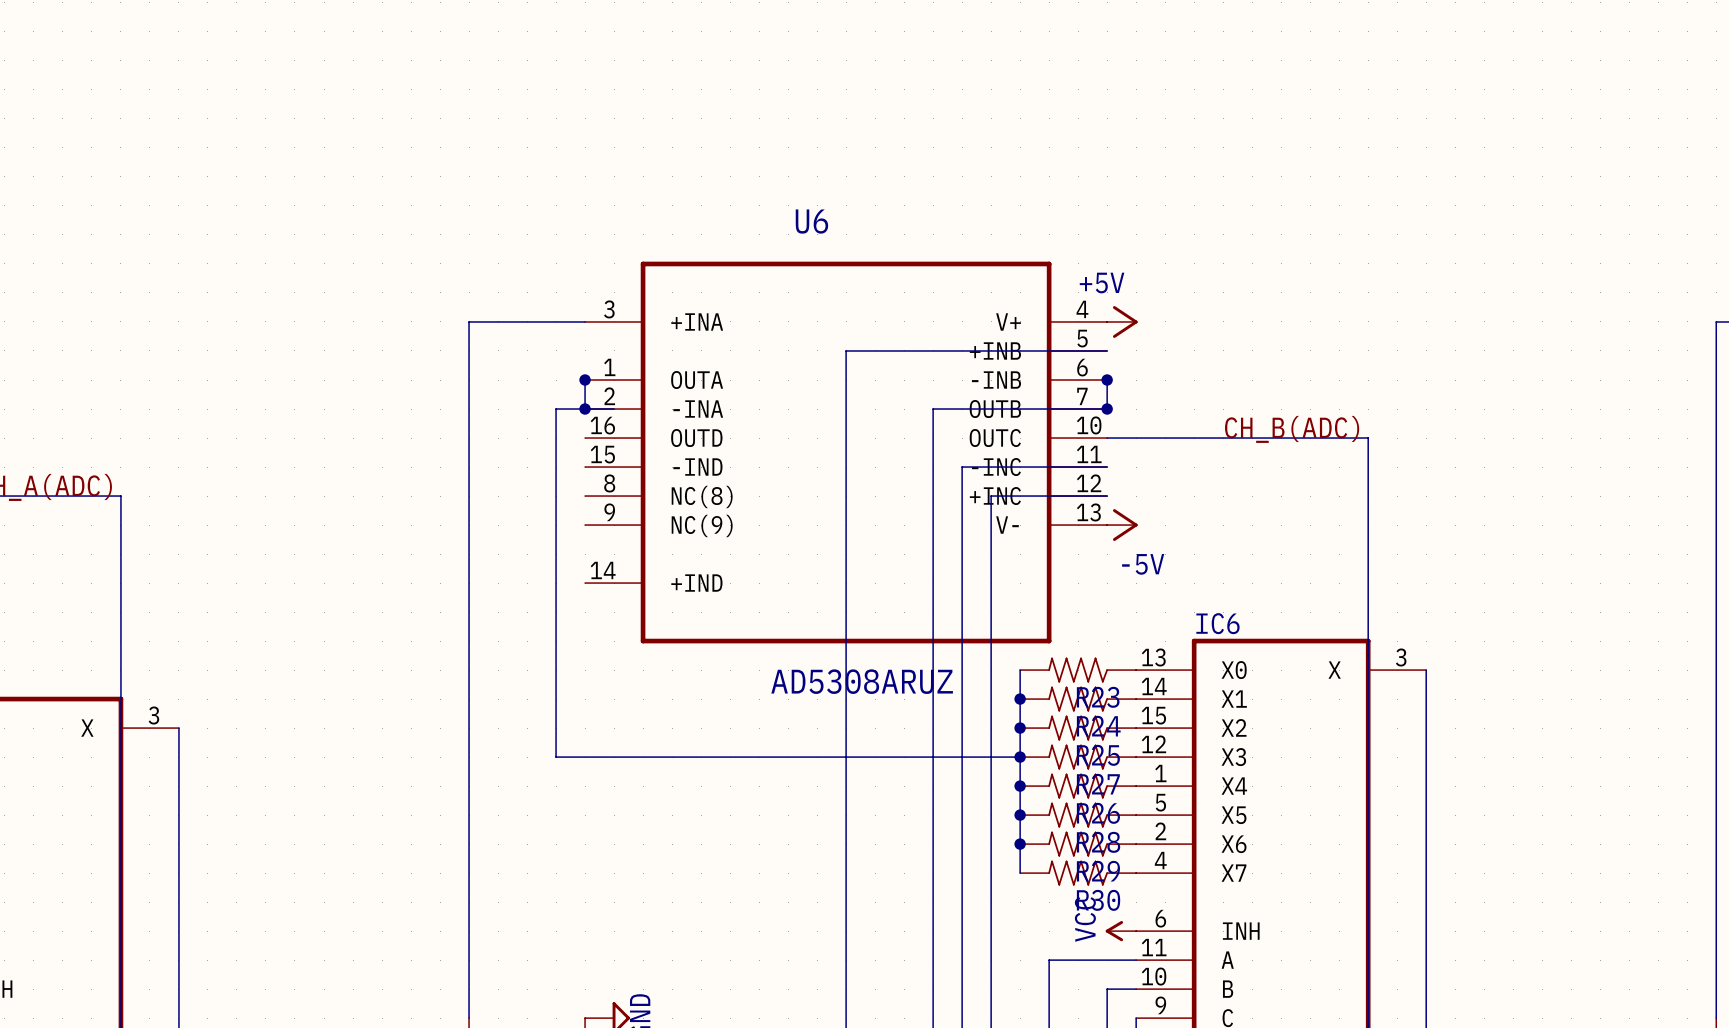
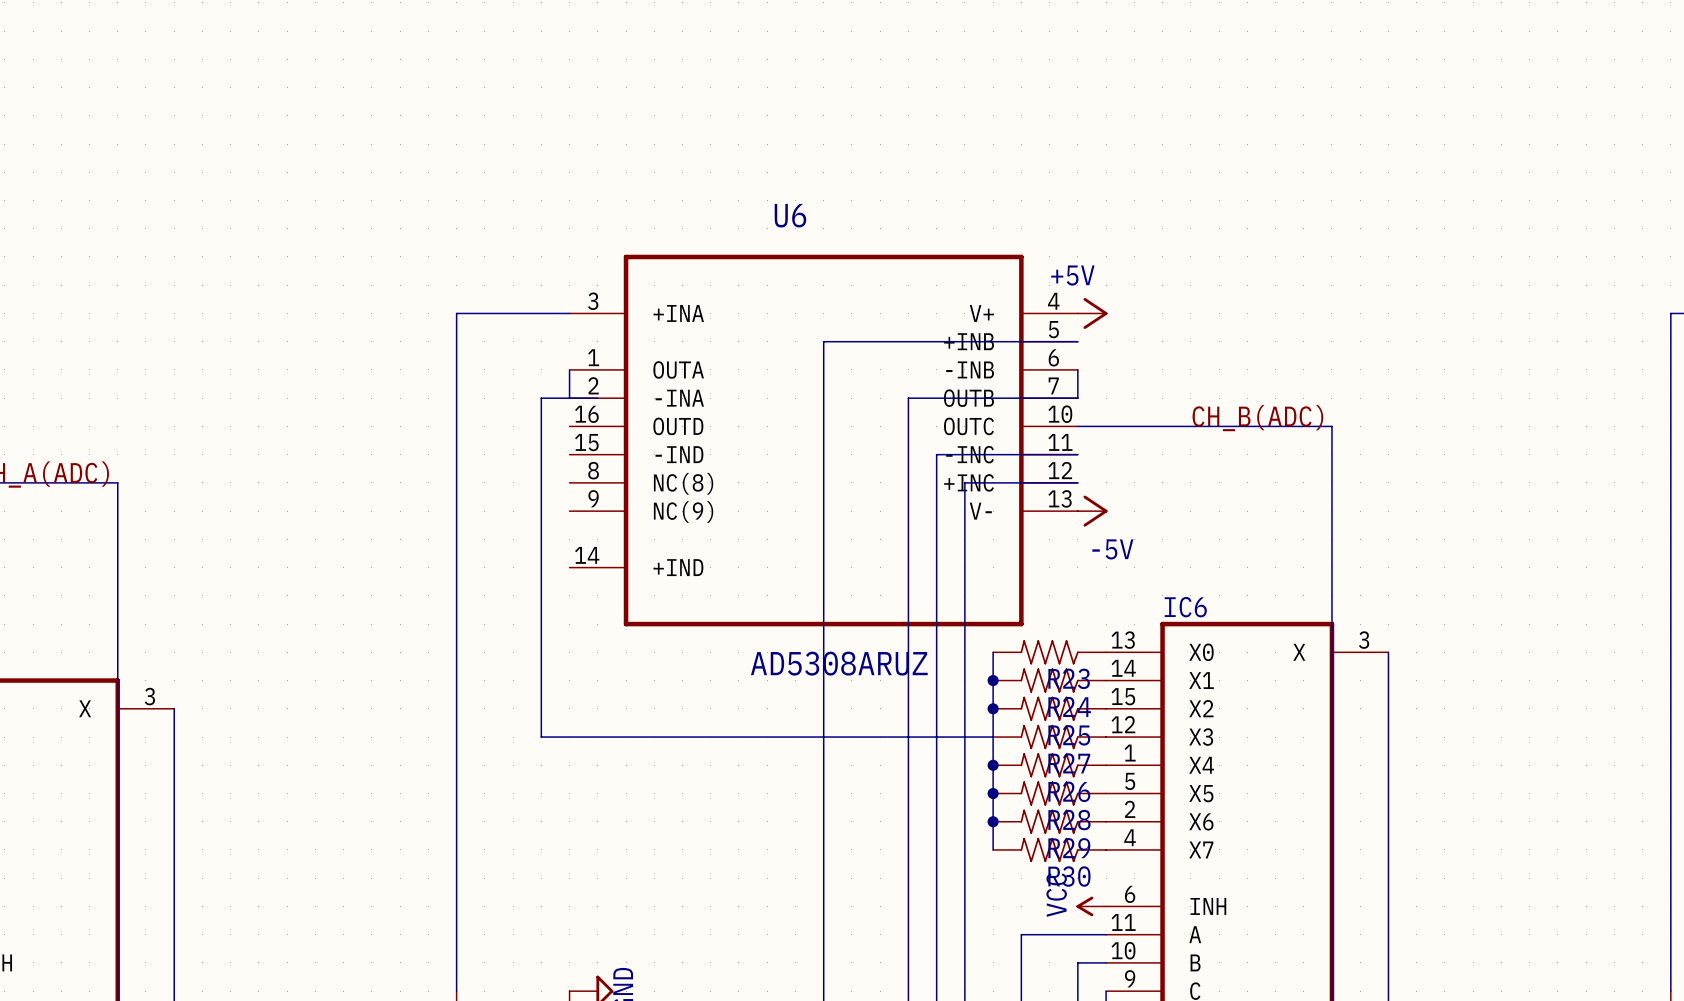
junction: (585, 380) -> none
junction: (1107, 380) -> none
junction: (585, 409) -> none
junction: (1107, 409) -> none
junction: (1020, 757) -> none

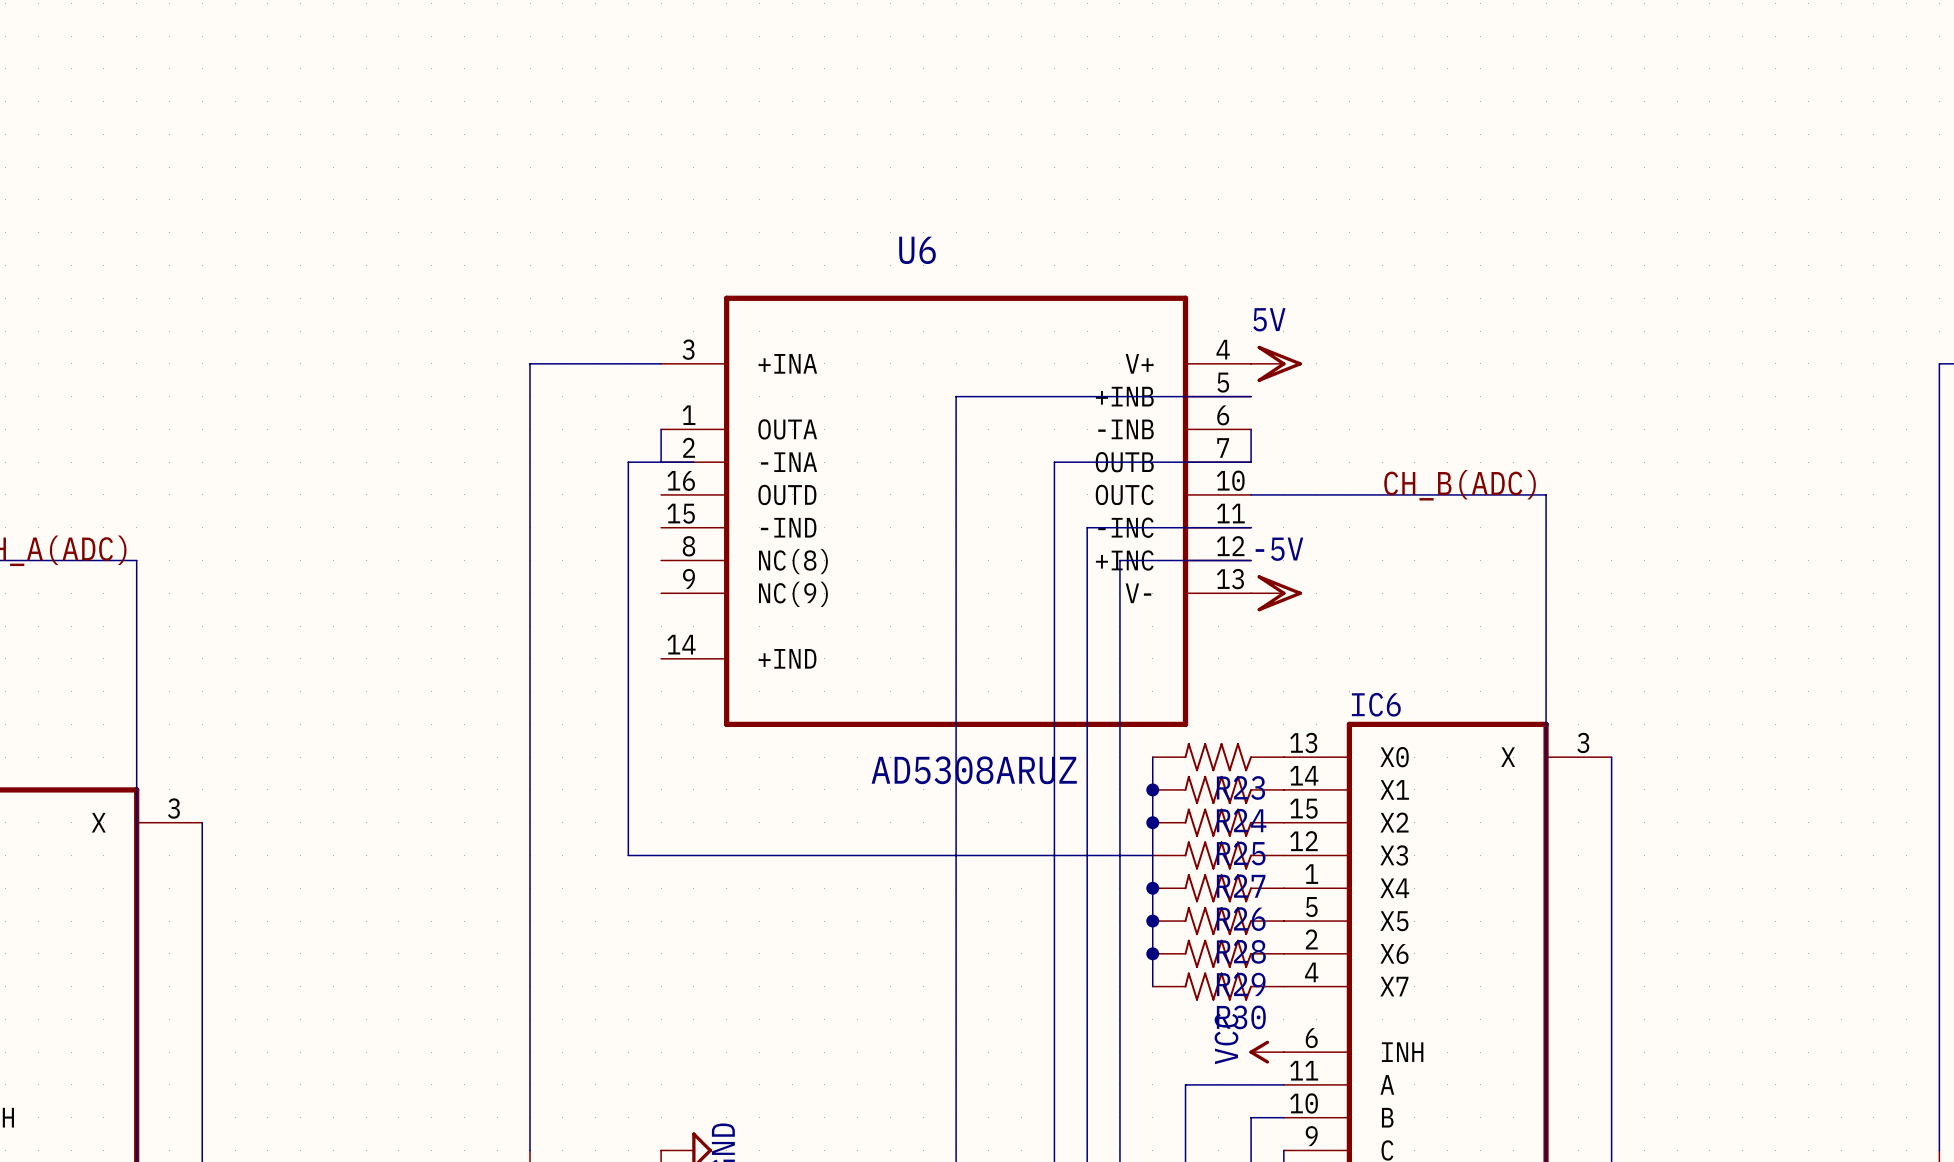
power symbol: +5V (1092, 313) -> 5V (1276, 363)
power symbol shape: [1077, 495, 1108, 527] -> [1251, 575, 1302, 612]
power symbol text position: -5V (1112, 549) -> -5V (1279, 549)

